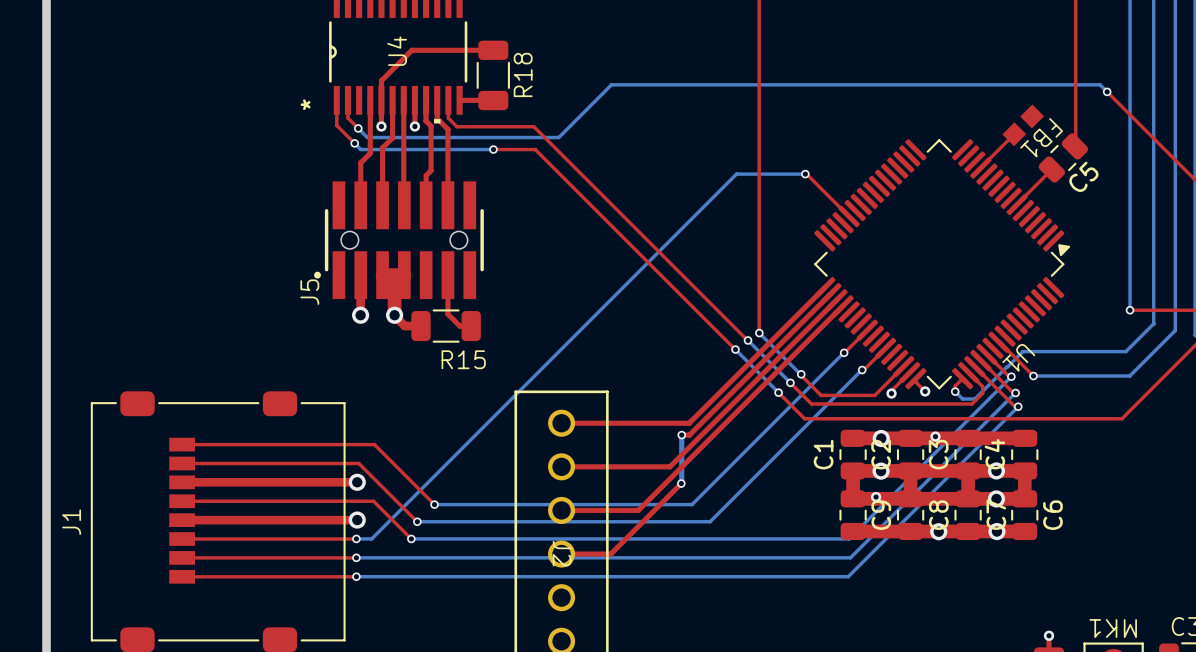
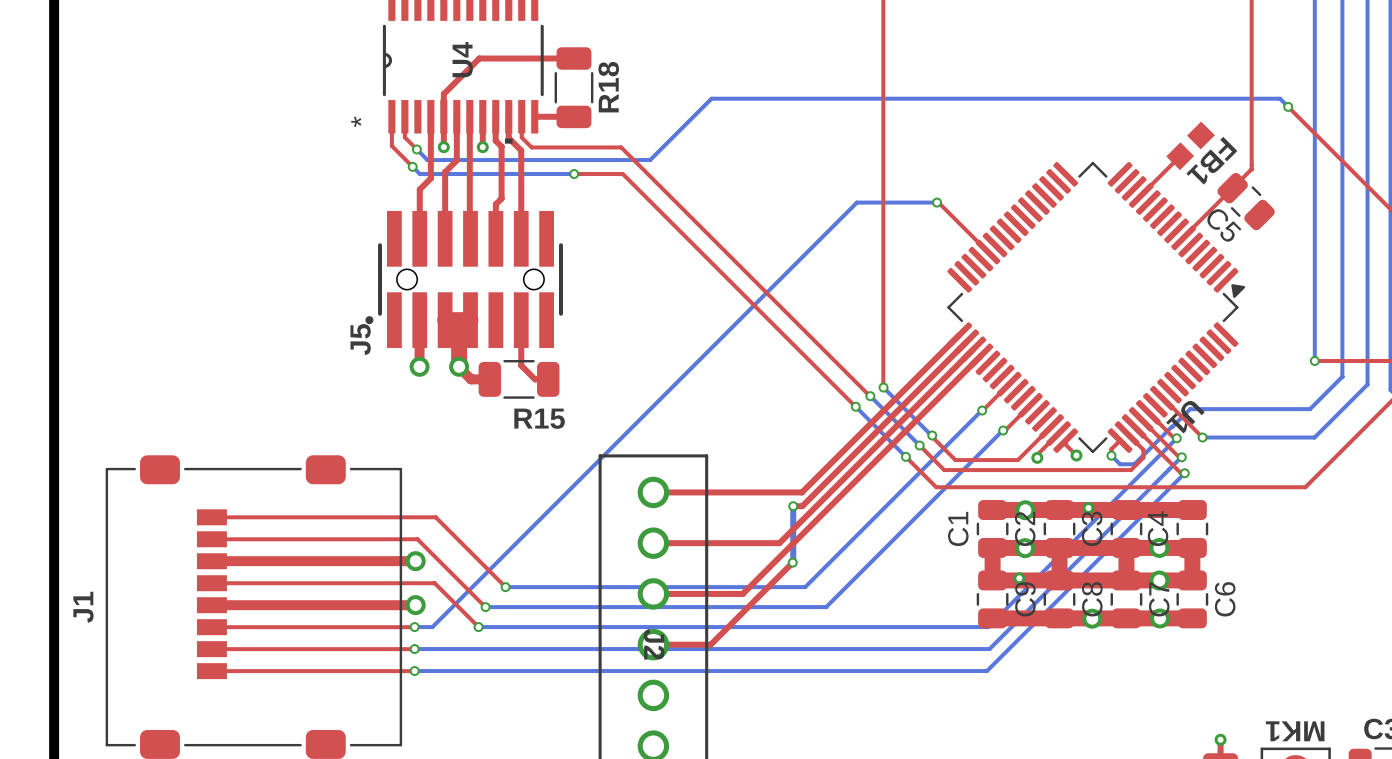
C5 rotation: 0° (1063, 157) -> 90° clockwise (1246, 201)
top track: (1051, 169) (1017, 204) -> (1251, 169) (1183, 237)

